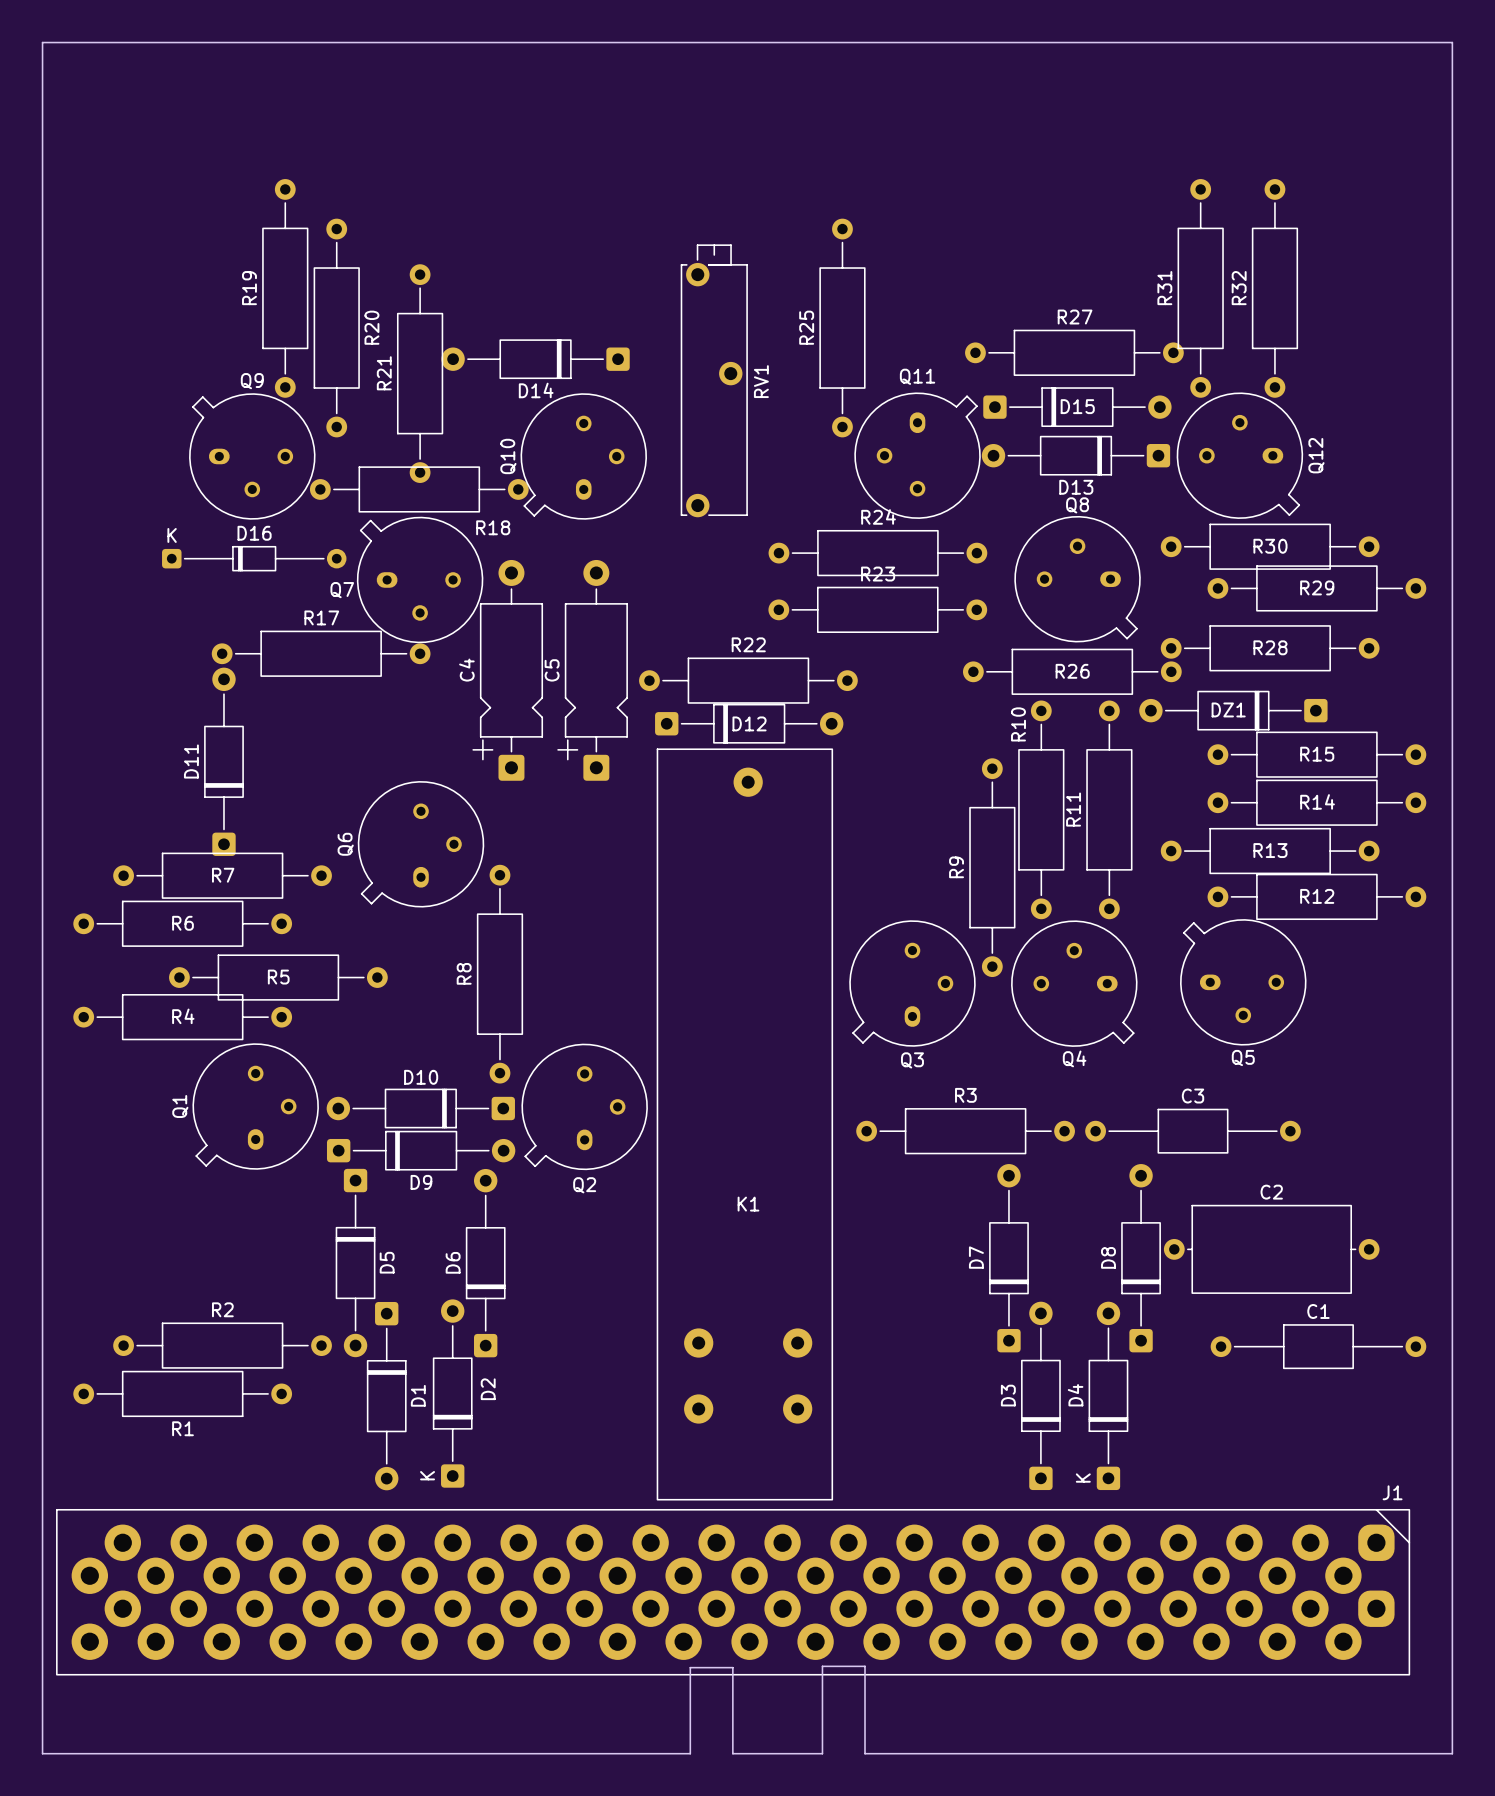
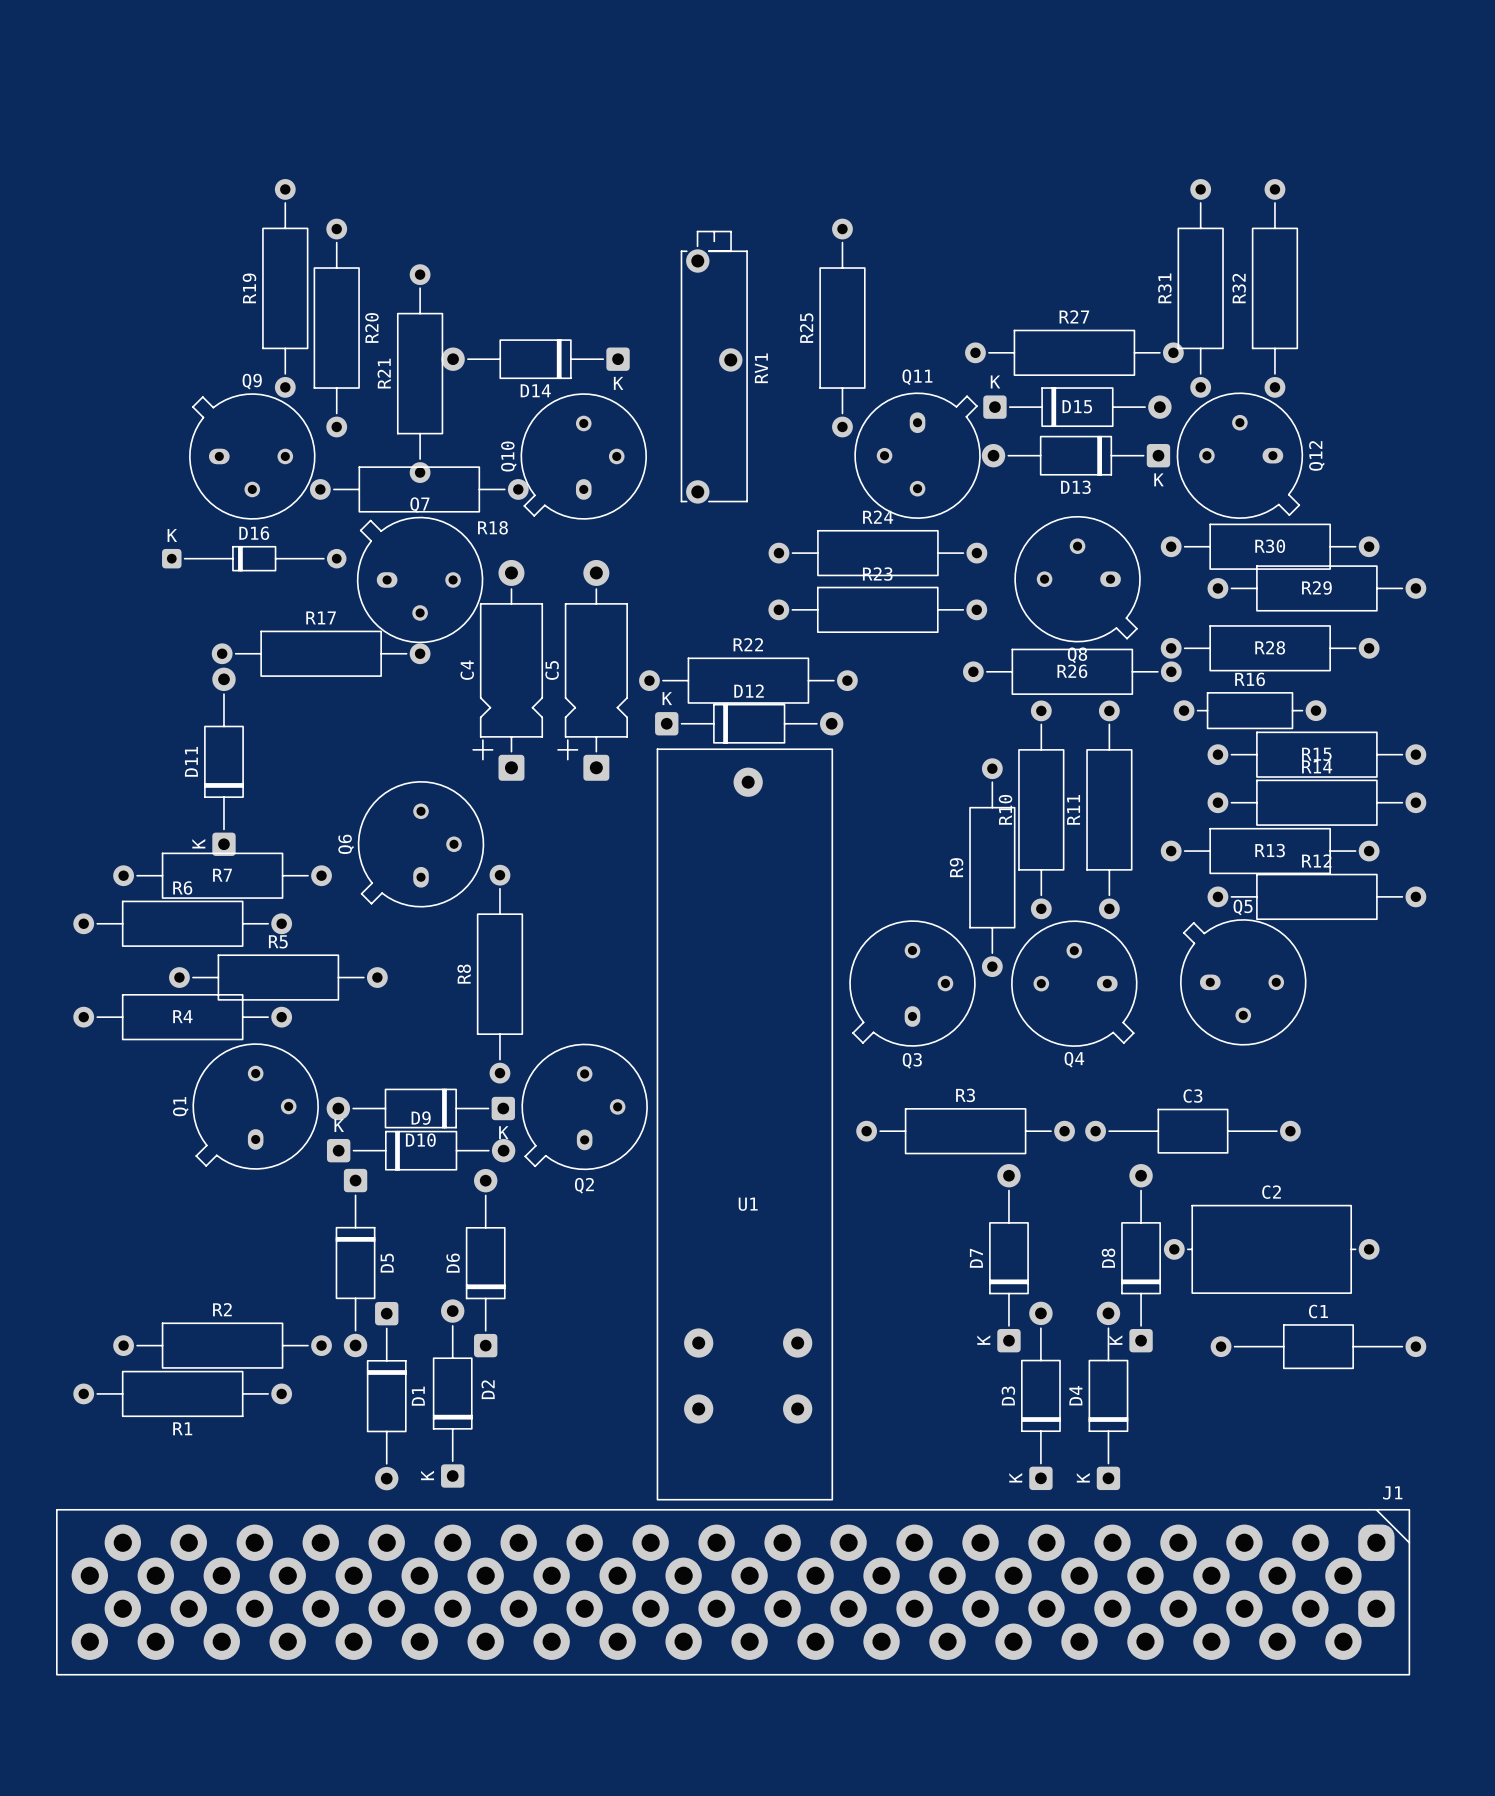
board edge: (42, 42) (1452, 42) (1452, 1753) (865, 1753) (865, 1666) (822, 1666) (822, 1753) (732, 1753) (732, 1667) (690, 1667) (690, 1753) (42, 1753) (42, 42) -> none
RV1 position: (714, 380) -> (714, 367)
D15 text: none -> K (995, 381)
D14 text: none -> K (618, 383)
D13 text: none -> K (1159, 479)
Q8 name position: Q8 (1077, 505) -> Q8 (1077, 655)
Q7 name position: Q7 (342, 590) -> Q7 (419, 505)
D12 text: none -> K (667, 698)
DZ1: (1233, 710) -> none
R16: none -> (1250, 710)
D12 name position: D12 (749, 723) -> D12 (749, 691)
R10 name position: R10 (1018, 724) -> R10 (1005, 809)
R14 name position: R14 (1317, 801) -> R14 (1317, 766)
D11 text: none -> K (198, 843)
R12 name position: R12 (1317, 896) -> R12 (1316, 860)
R6 name position: R6 (182, 923) -> R6 (182, 887)
R5 name position: R5 (278, 977) -> R5 (278, 941)
Q5 name position: Q5 (1243, 1058) -> Q5 (1243, 907)
D10 name position: D10 (421, 1077) -> D10 (420, 1140)
D9 text: none -> K (339, 1125)
D10 text: none -> K (503, 1132)
D9 name position: D9 (421, 1182) -> D9 (421, 1118)
K1 name: K1 (748, 1204) -> U1 (748, 1204)
D7 text: none -> K (983, 1340)
D8 text: none -> K (1115, 1340)
D3 text: none -> K (1015, 1477)

